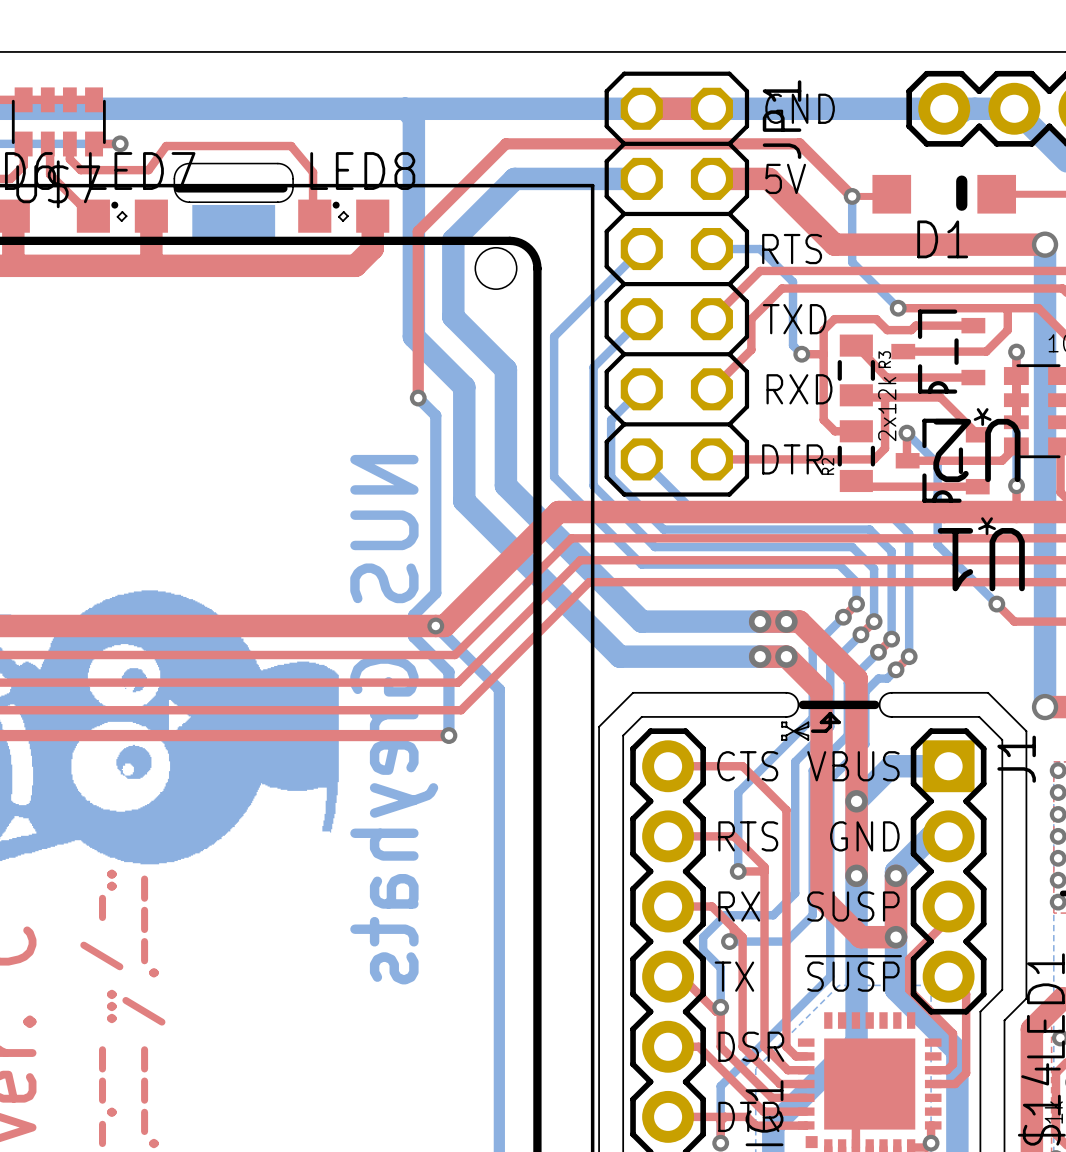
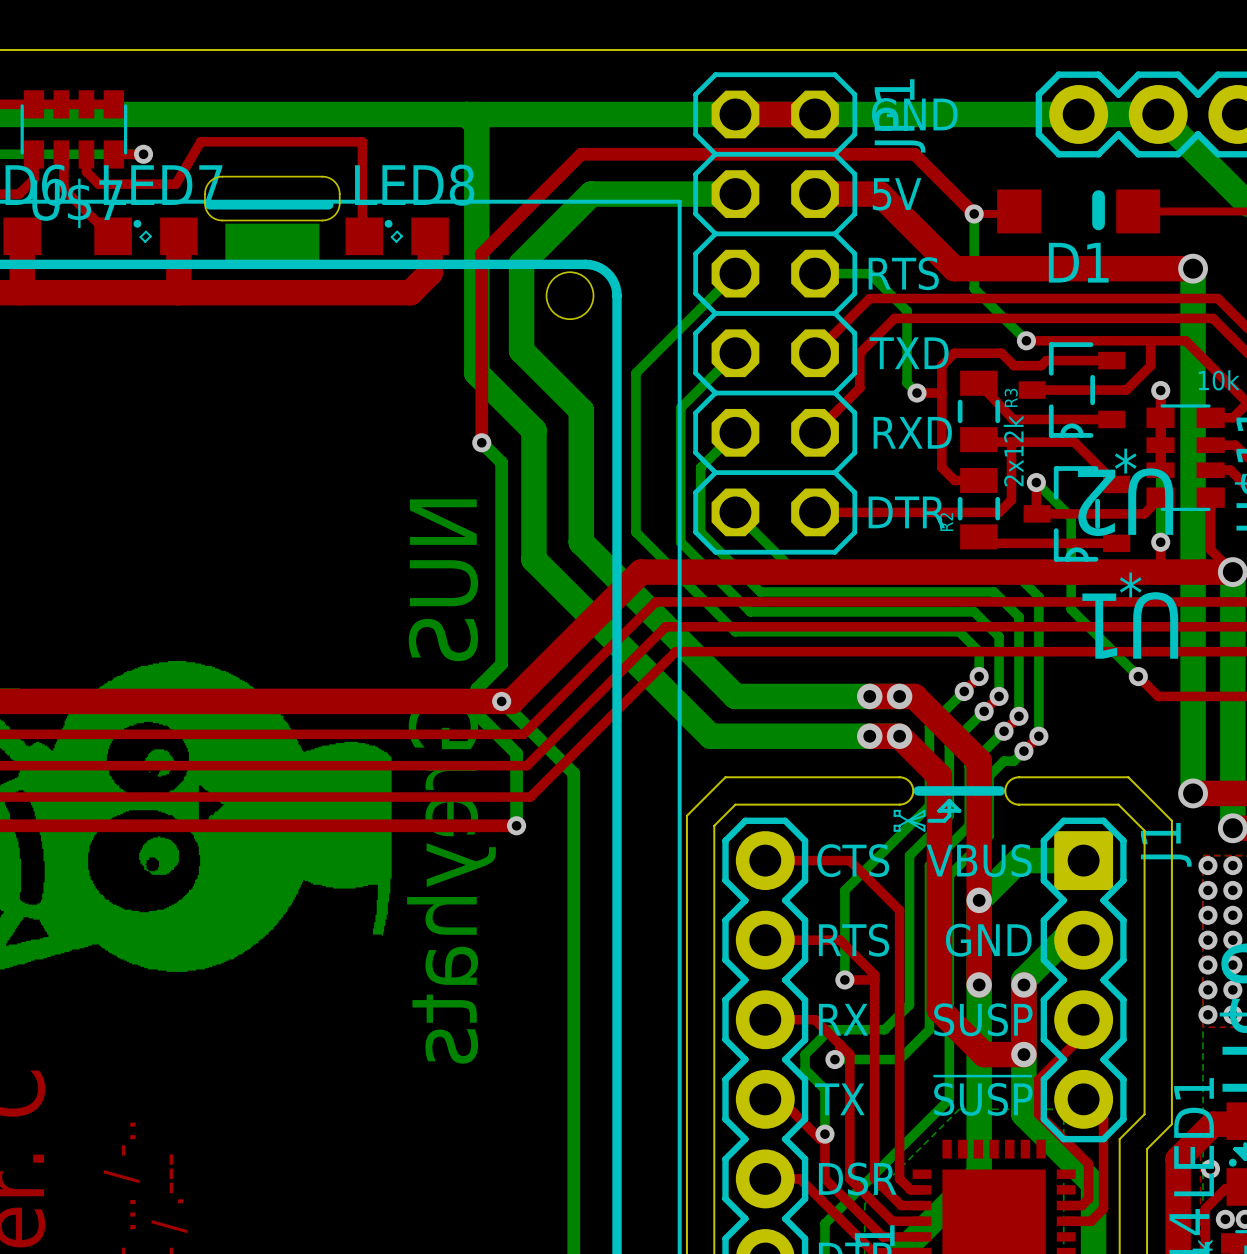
top track: (148, 170) (166, 146) (291, 146) (313, 172) -> (175, 184) (200, 141) (362, 141) (362, 186)

